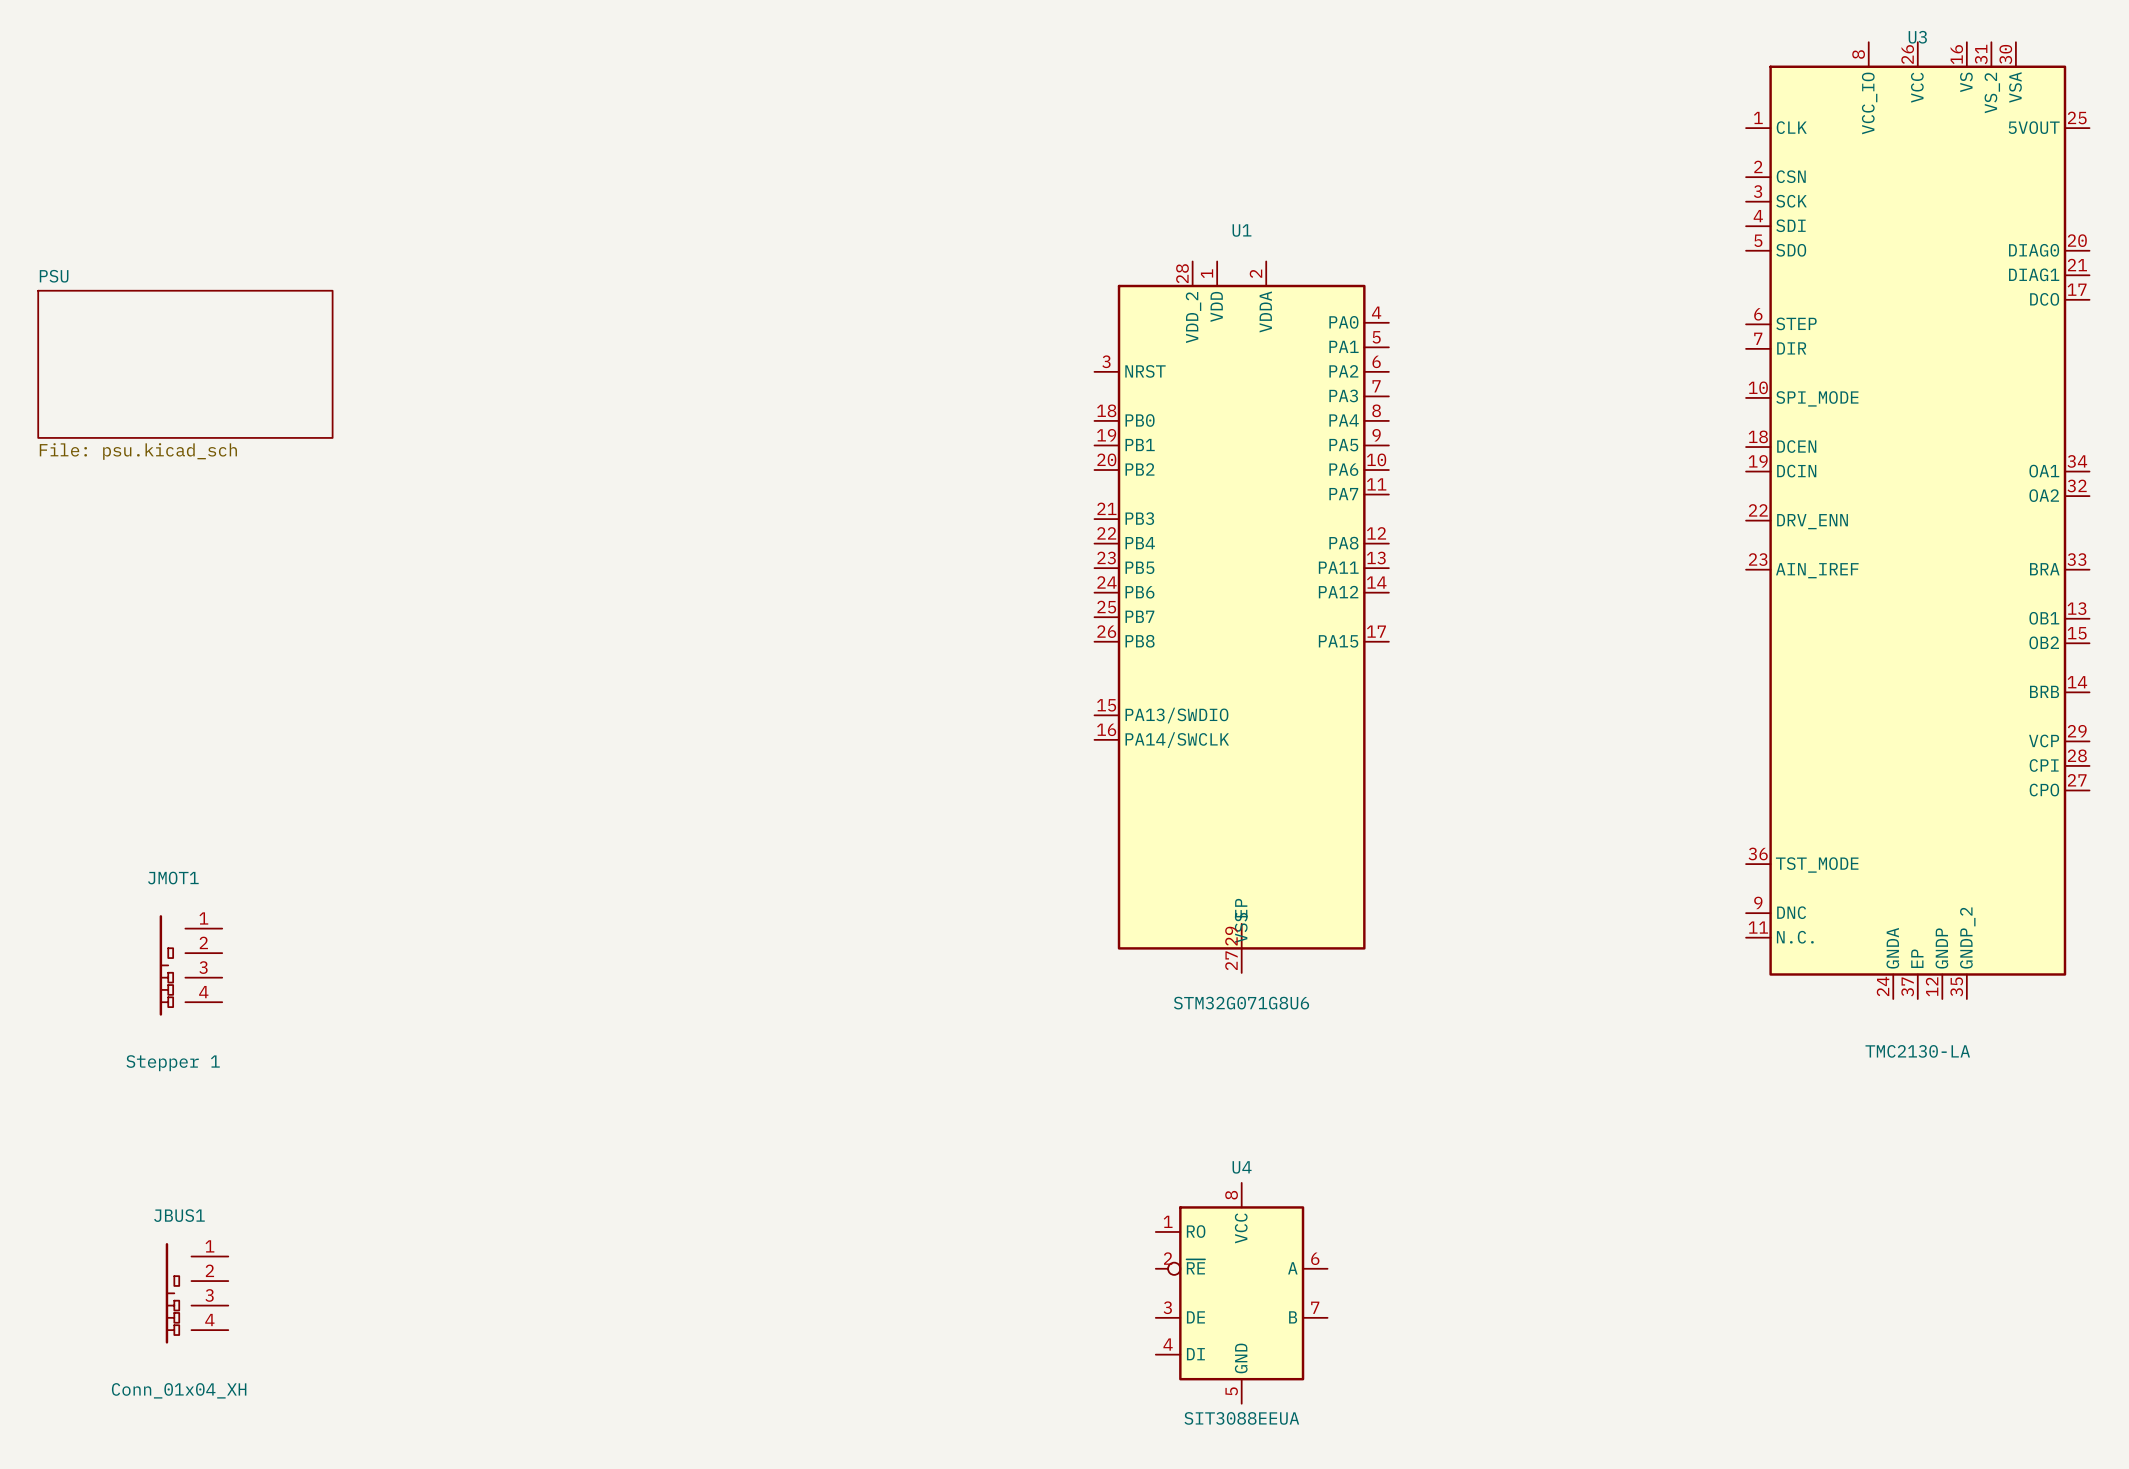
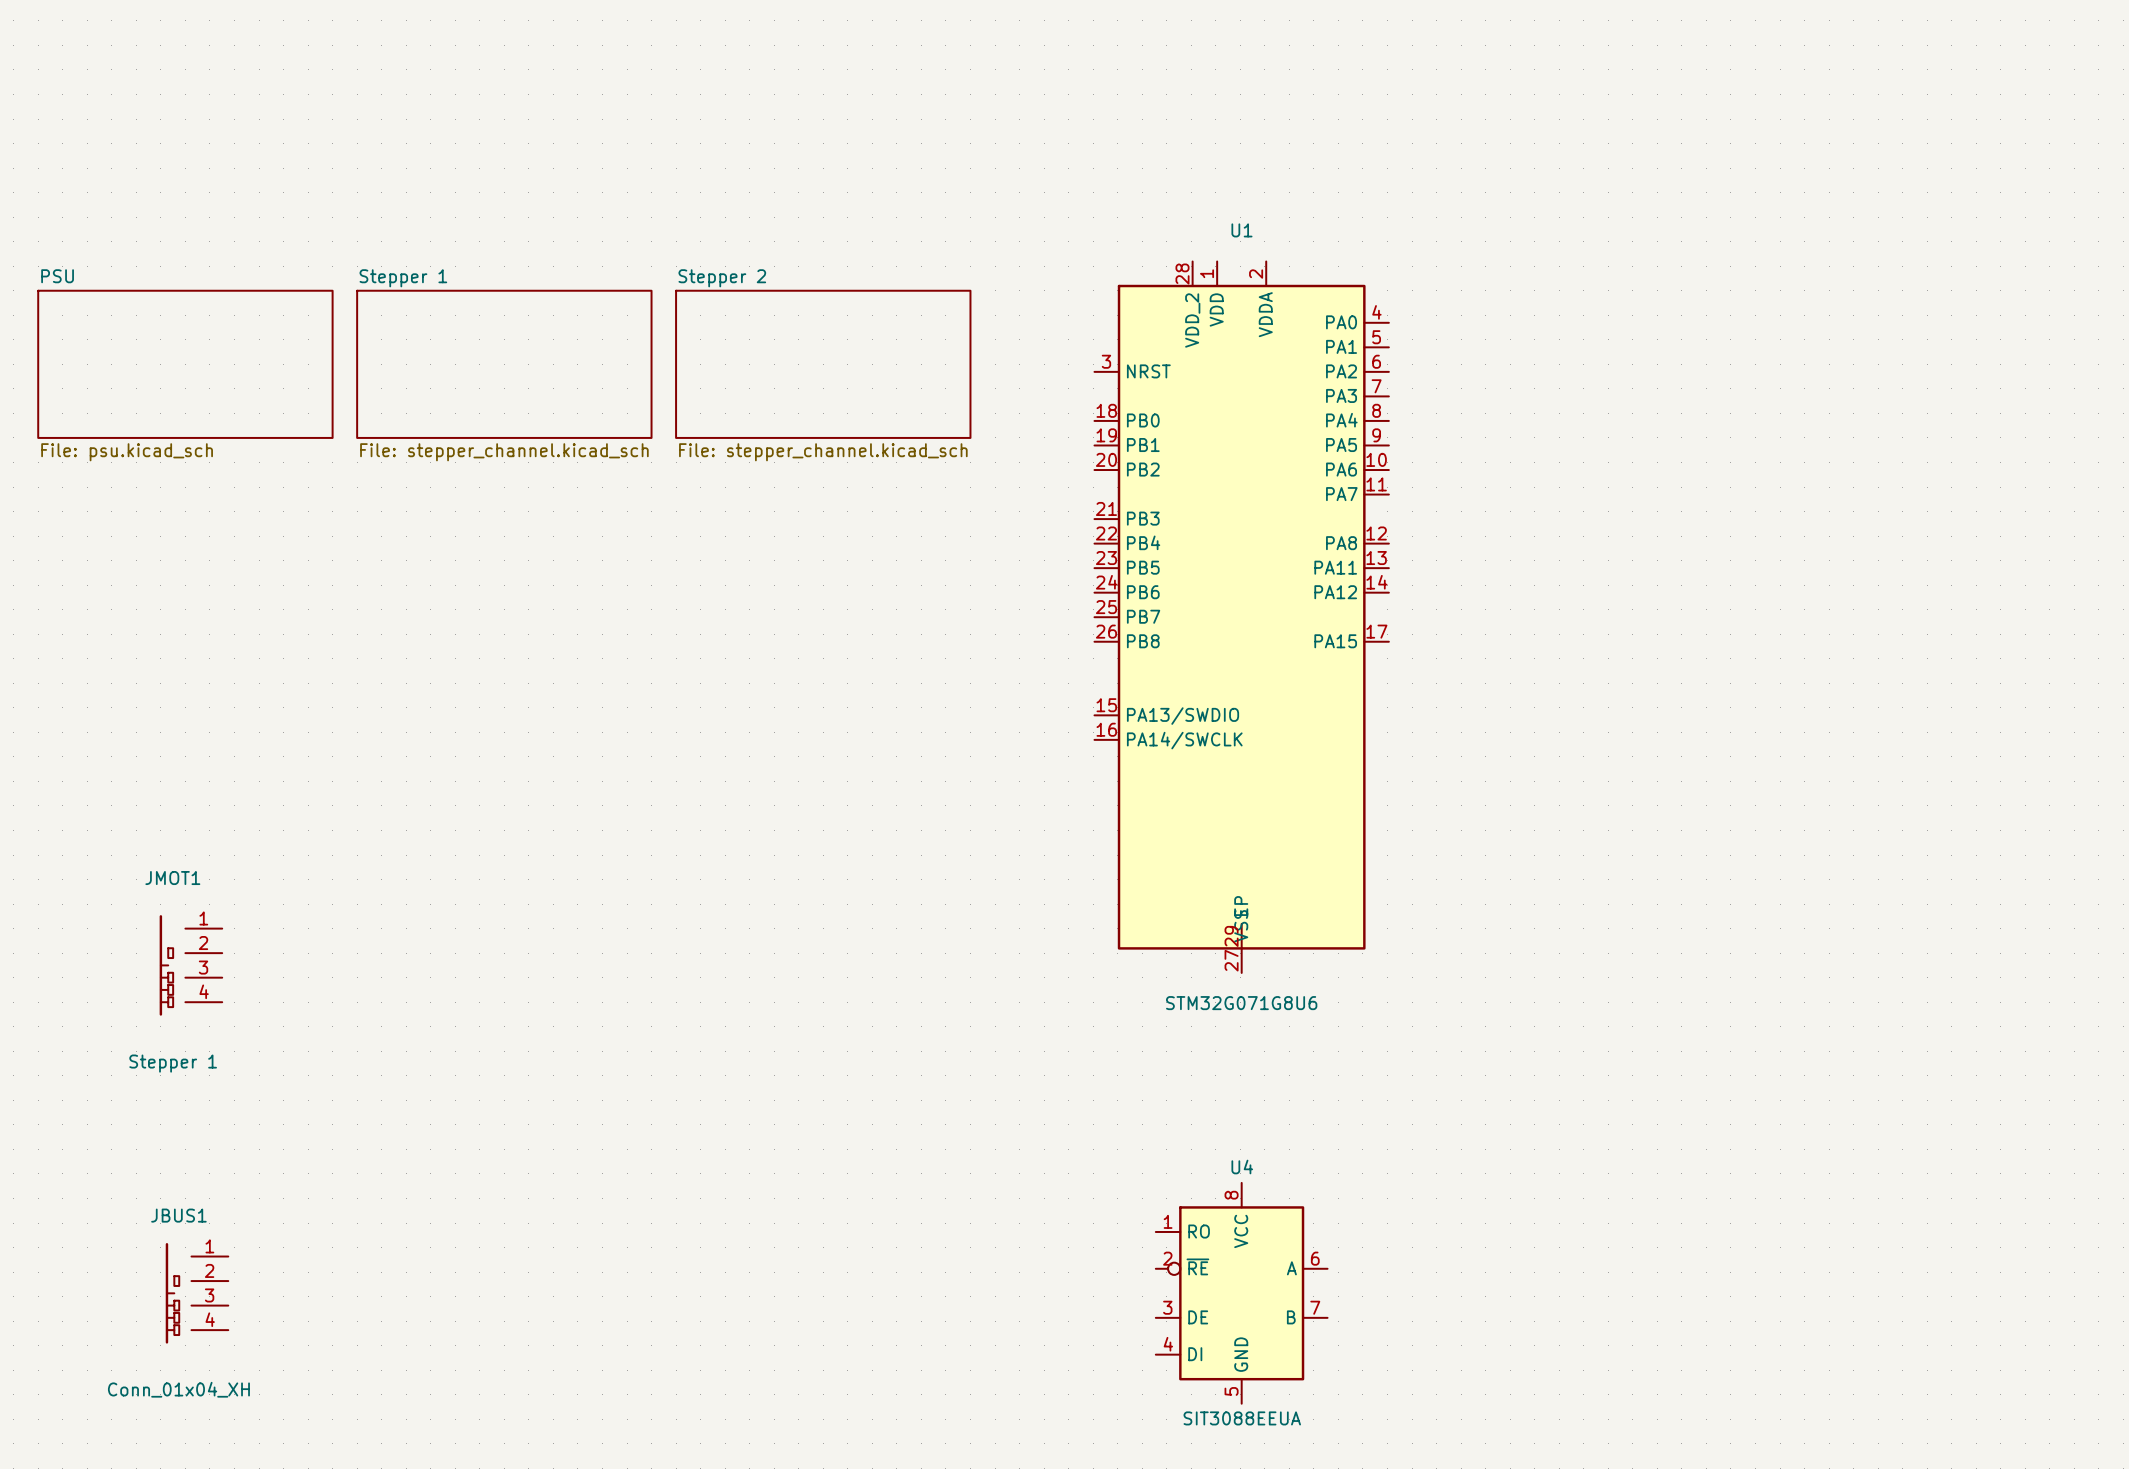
sheet Stepper 1: none -> File: stepper_channel.kicad_sch (504, 364)
sheet Stepper 2: none -> File: stepper_channel.kicad_sch (823, 364)
U3: TMC2130-LA (1917, 520) -> none

